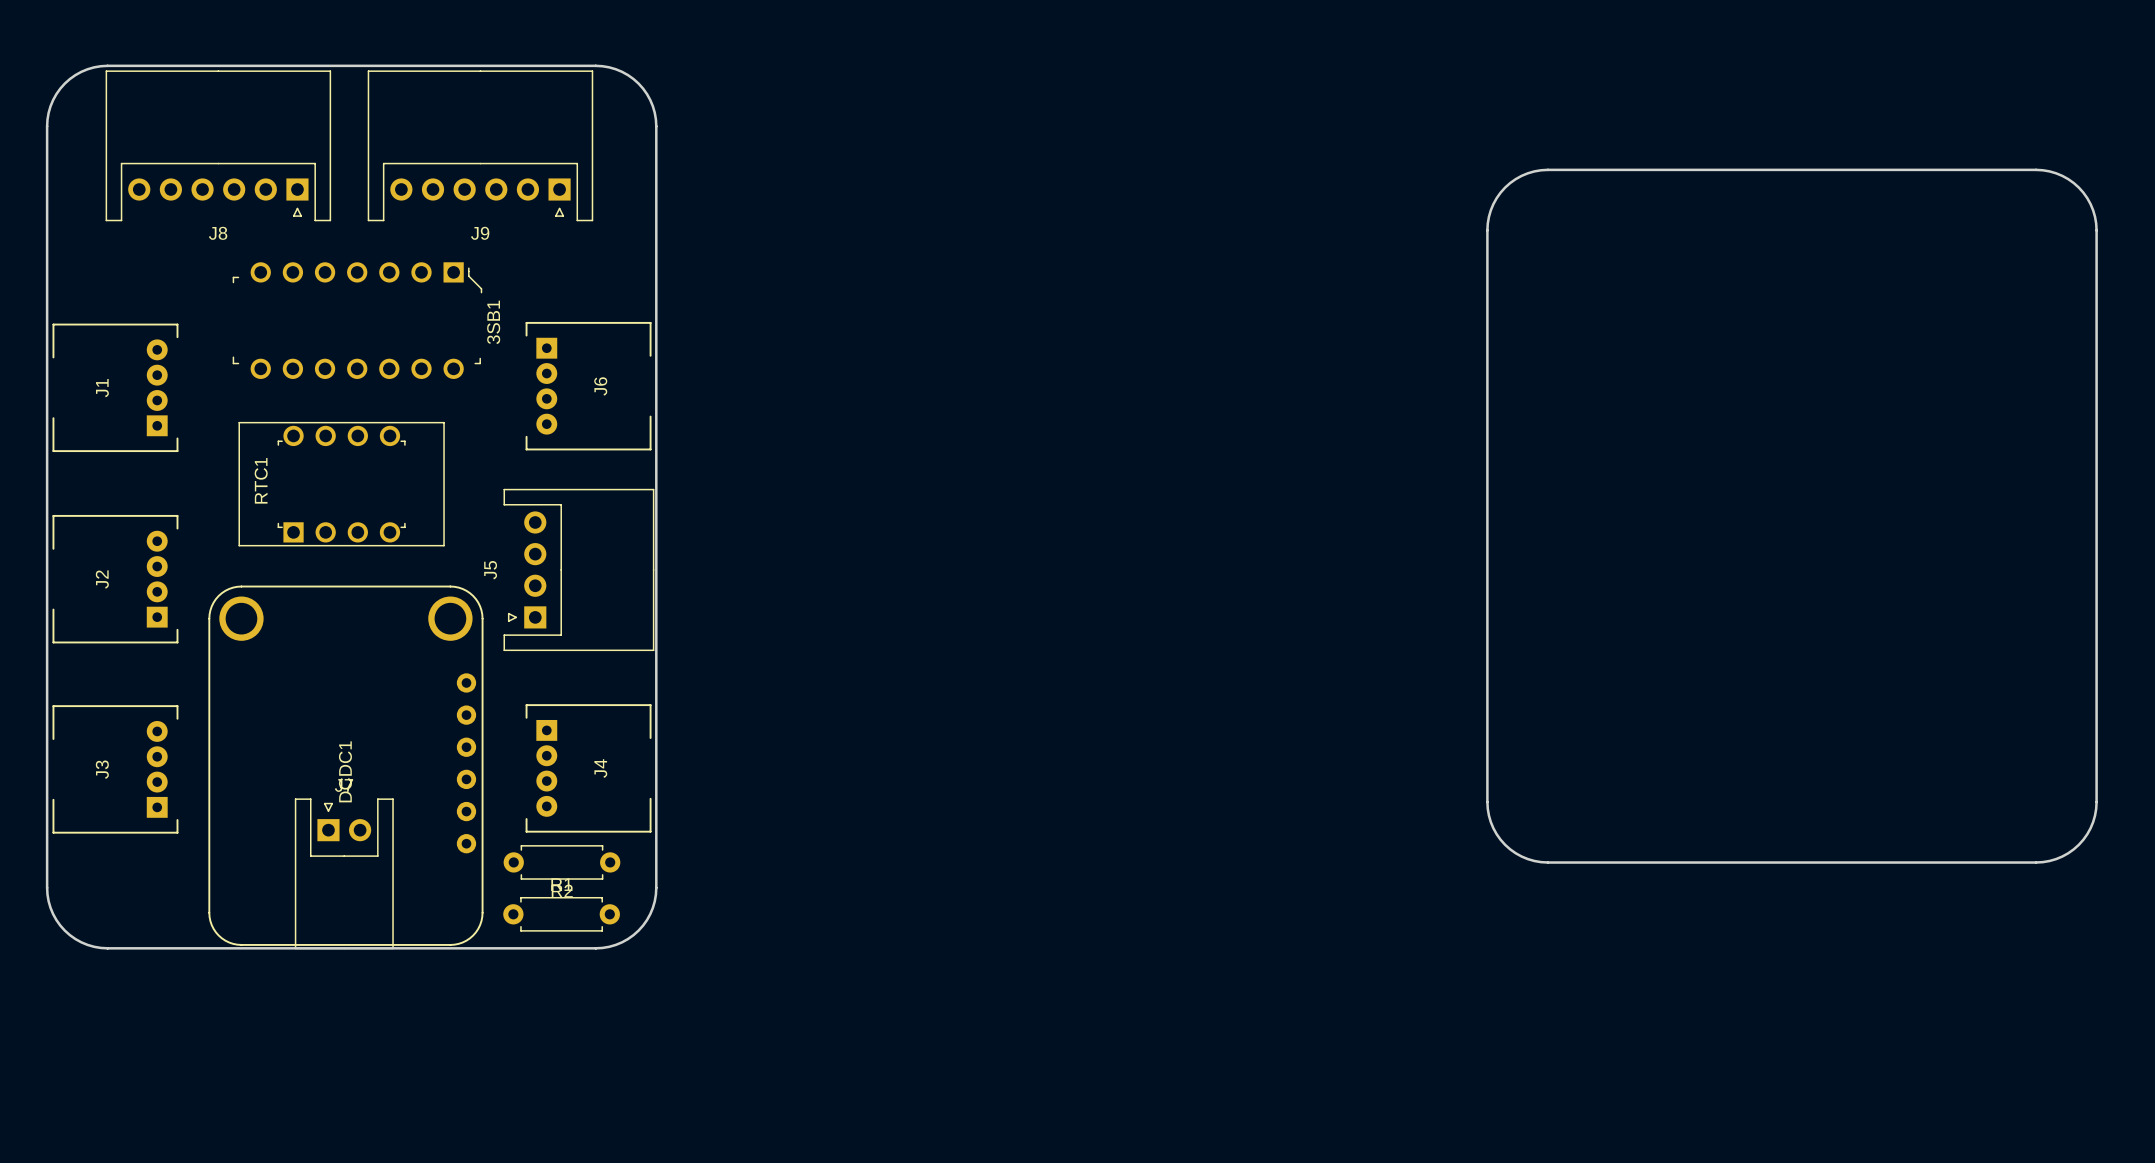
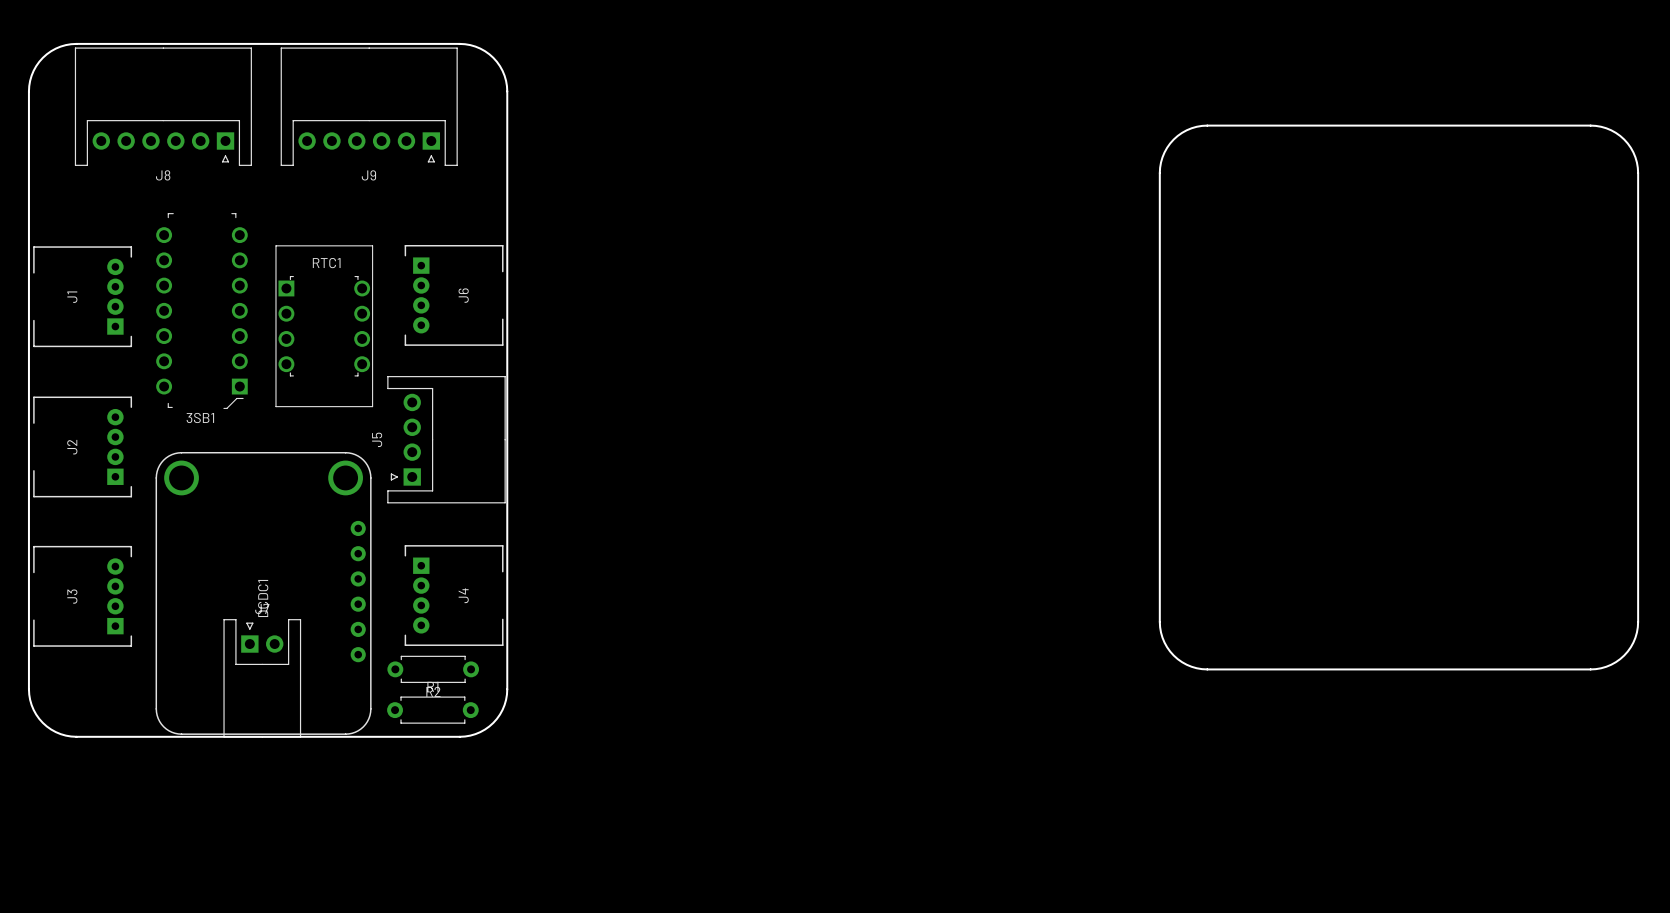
3SB1 rotation: 0° (357, 320) -> 90° clockwise (201, 311)
RTC1 rotation: 0° (341, 484) -> 90° clockwise (324, 326)

